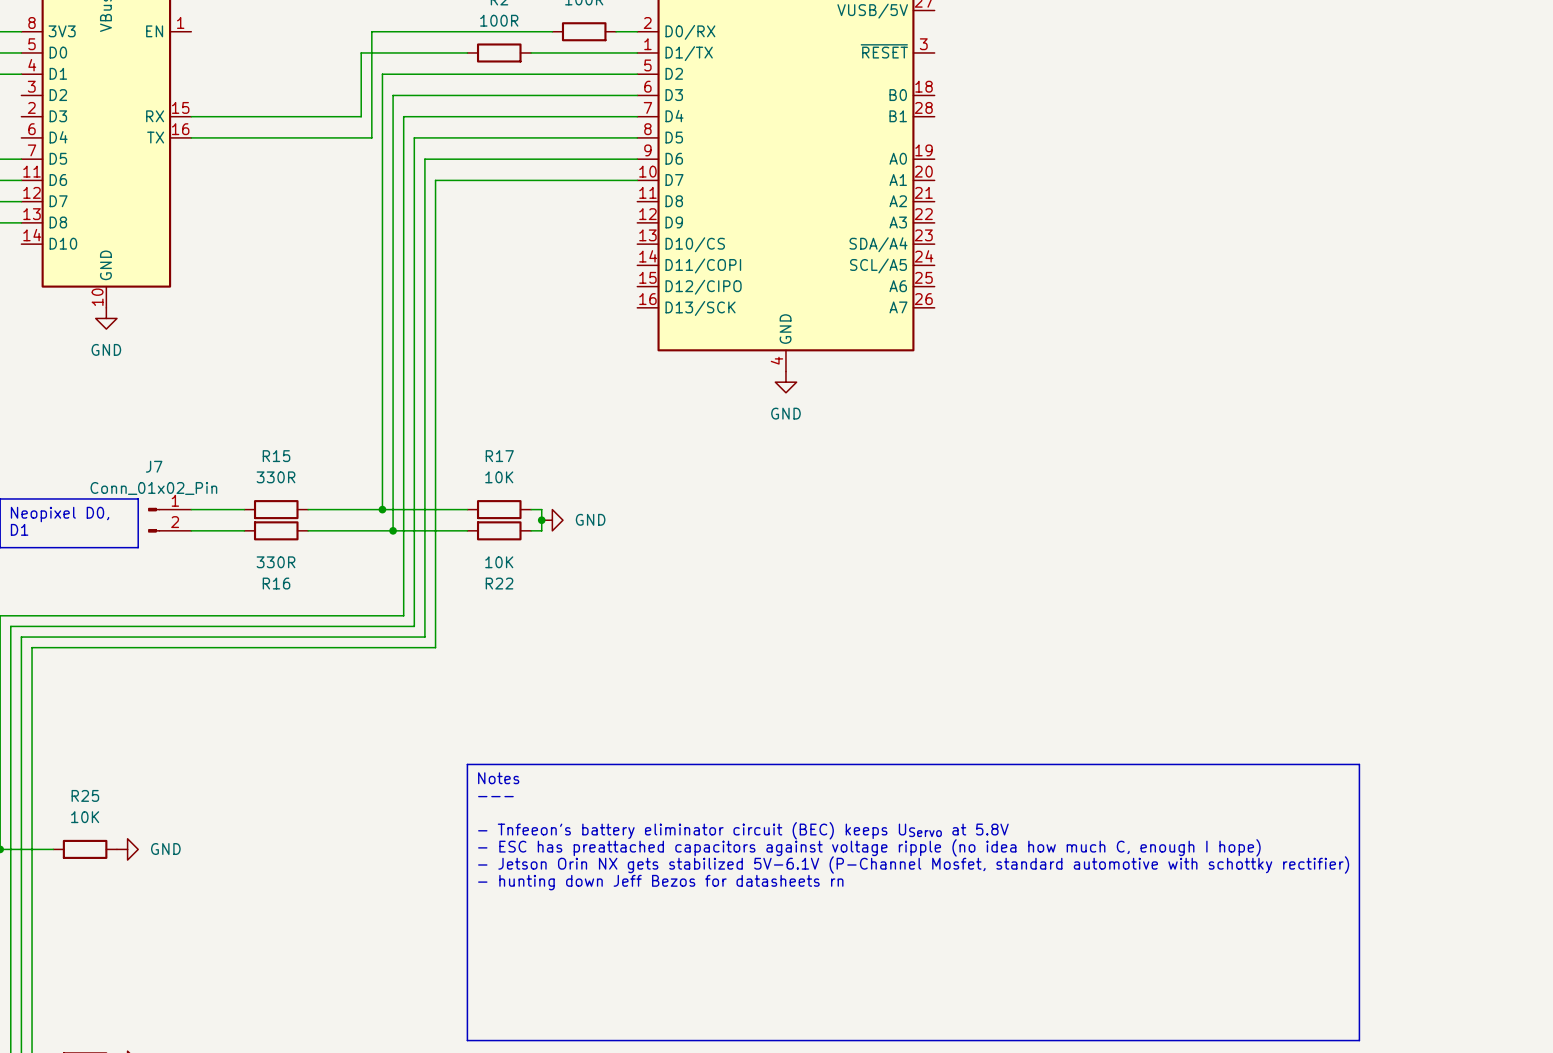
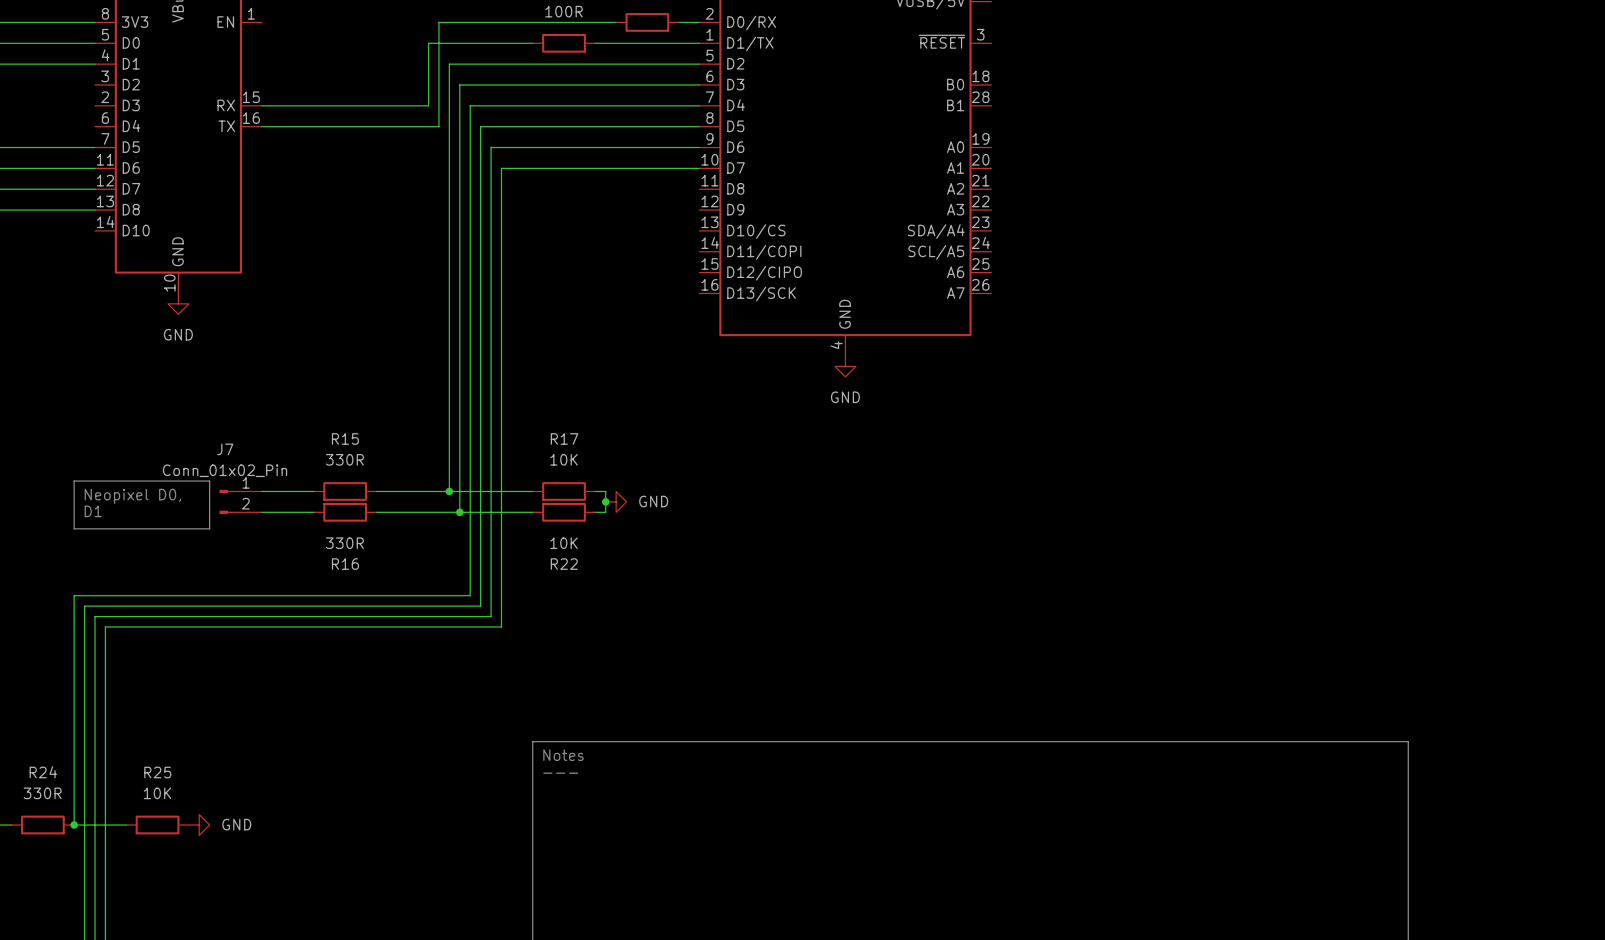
text: - Tnfeeon's battery eliminator circuit (BEC) keeps UServo at 5.8V (743, 830) -> none
text: - ESC has preattached capacitors against voltage ripple (no idea how much C, enough I hope) (869, 847) -> none
text: - Jetson Orin NX gets stabilized 5V-6.1V (P-Channel Mosfet, standard automotive with schottky rectifier) (913, 864) -> none
text: - hunting down Jeff Bezos for datasheets rn (660, 882) -> none

